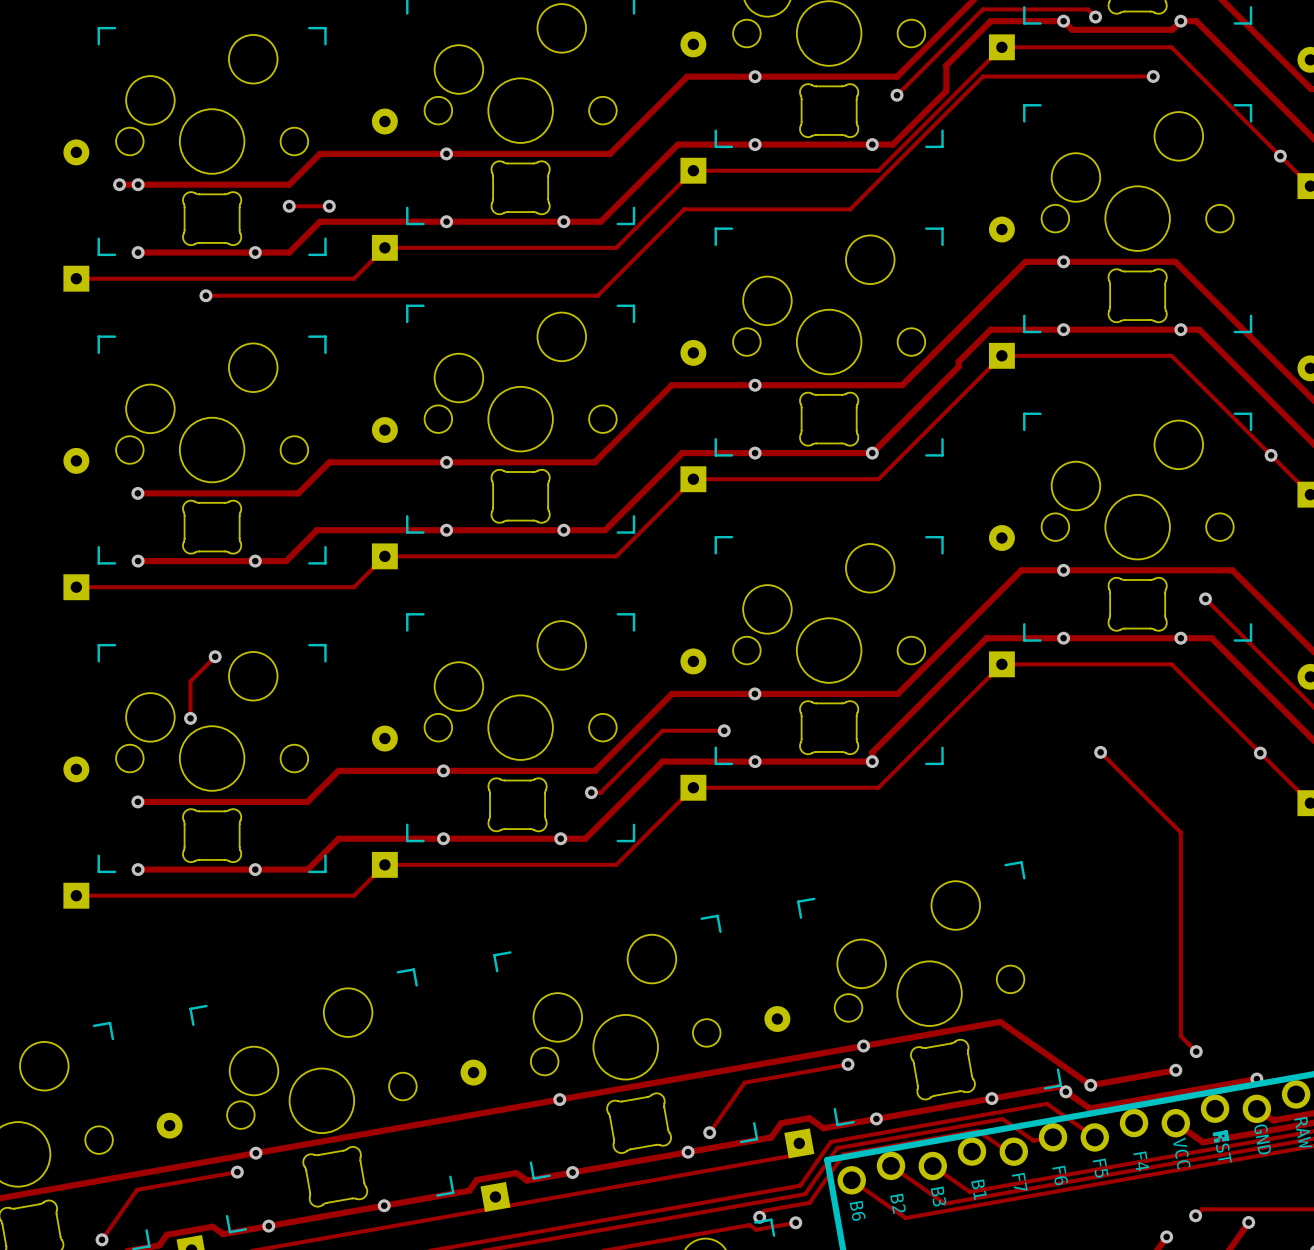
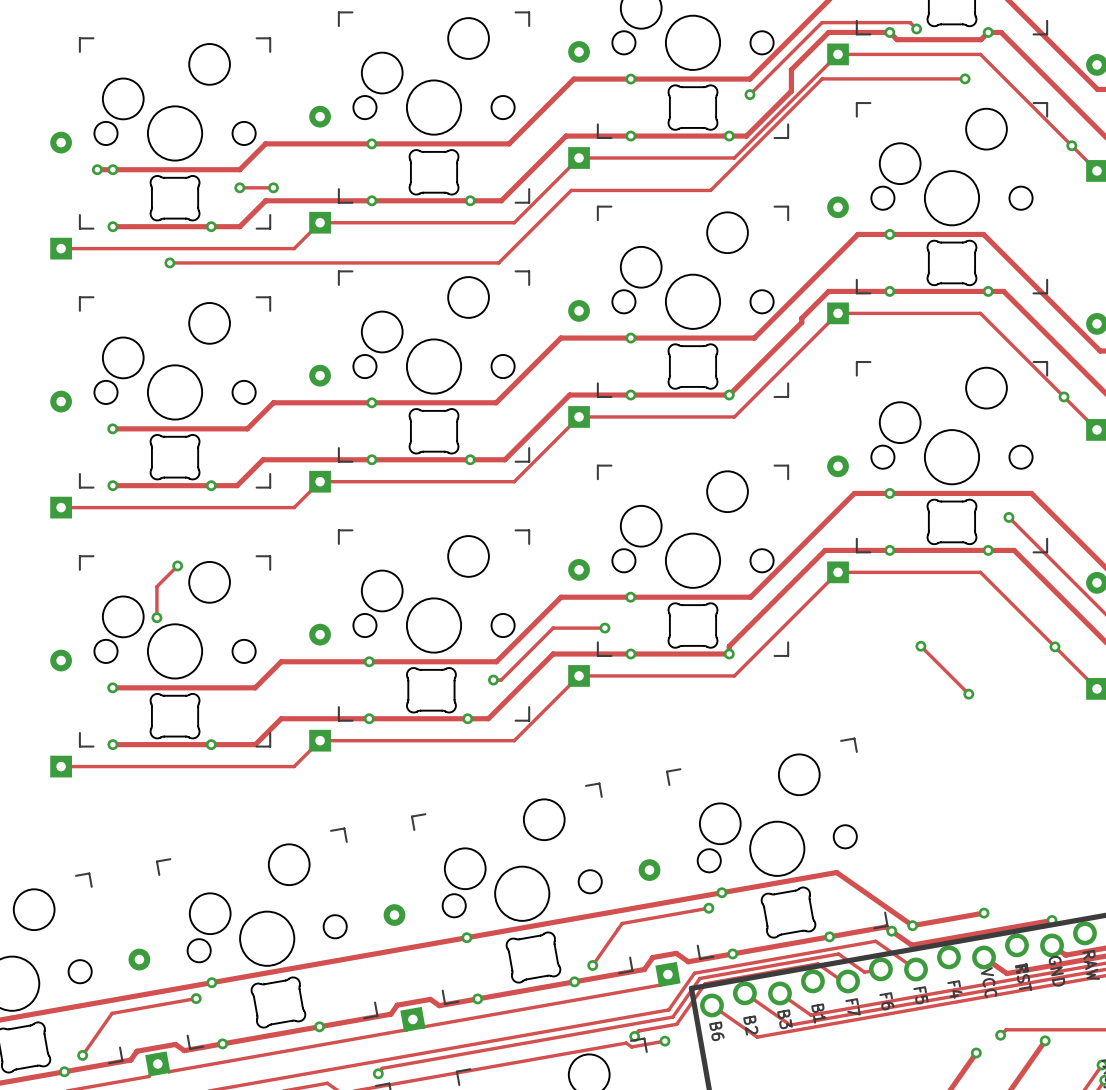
track: (1157, 809) (1180, 832) (1180, 1036) (1196, 1051) -> none
via: none -> (968, 694)
via: (1196, 1051) -> none

